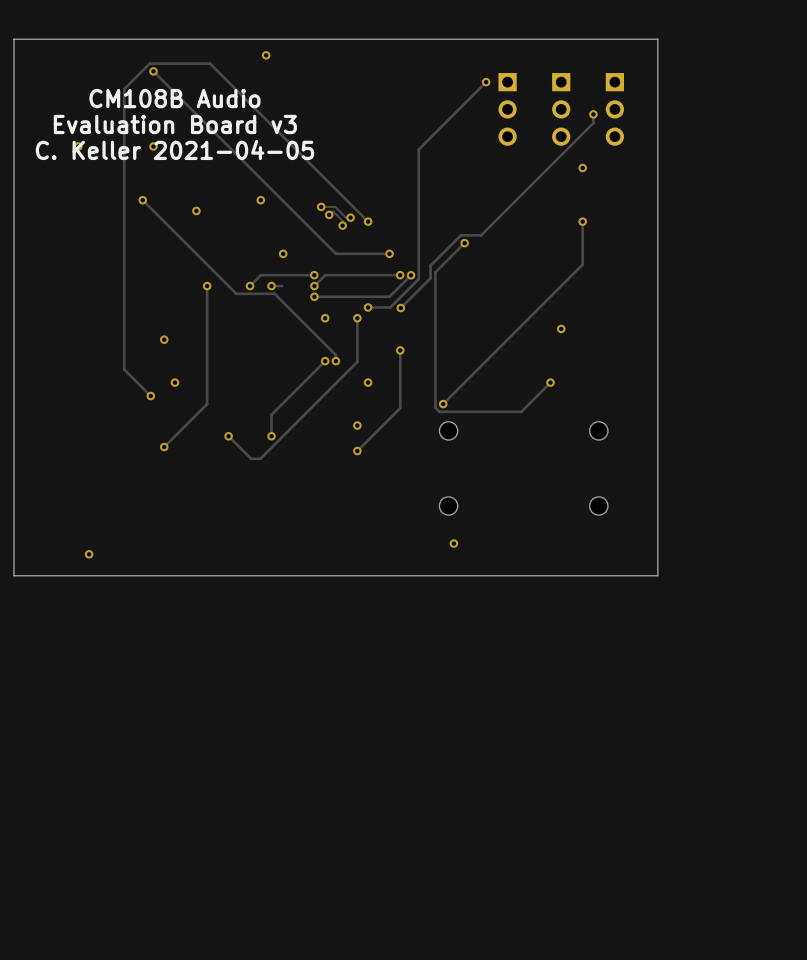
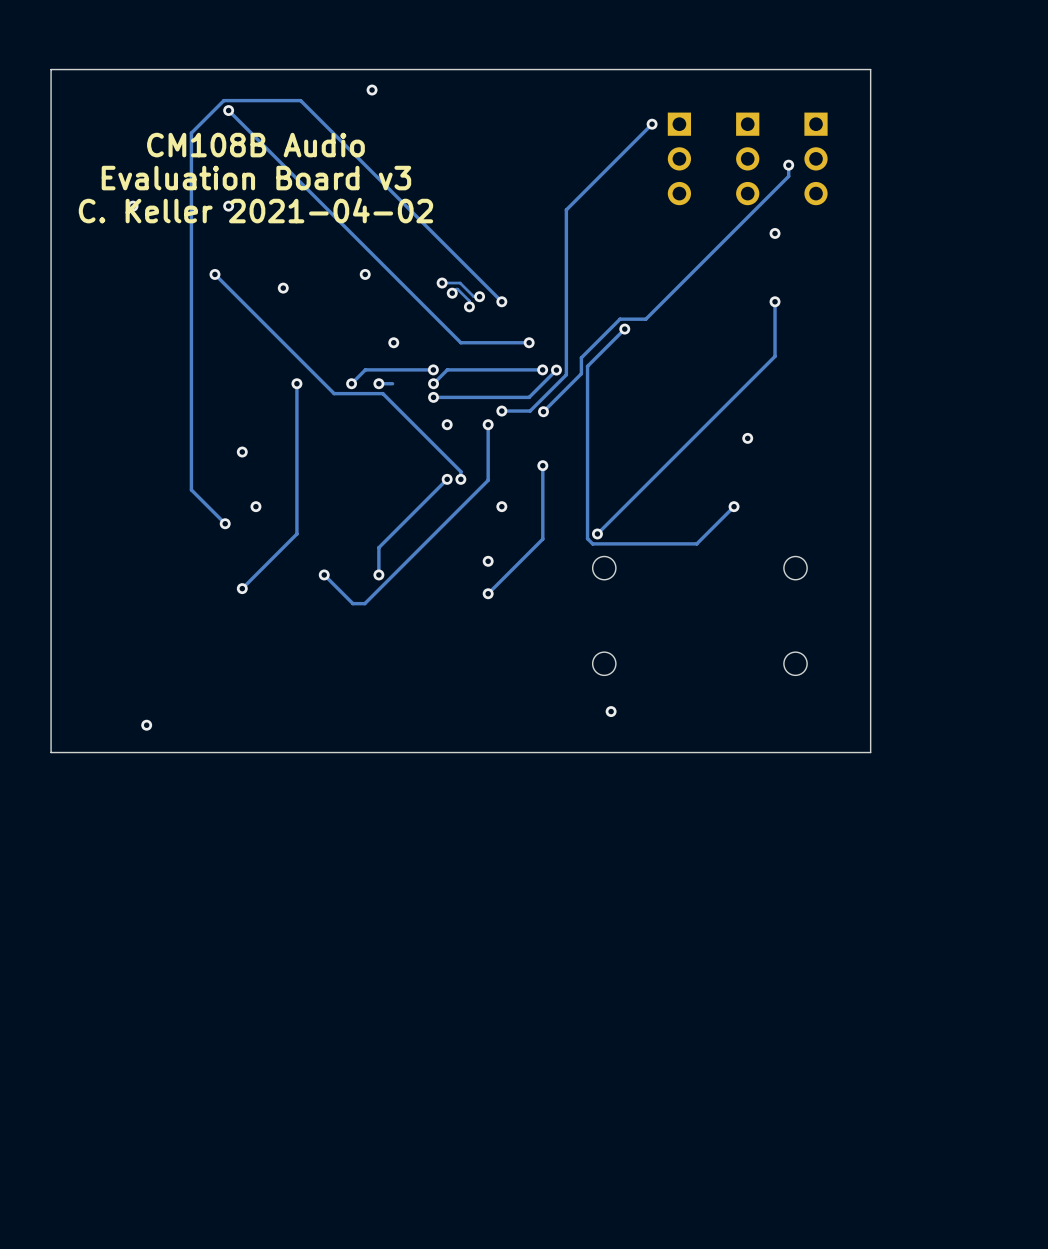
text: C. Keller 2021-04-05 (174, 150) -> C. Keller 2021-04-02 (255, 210)

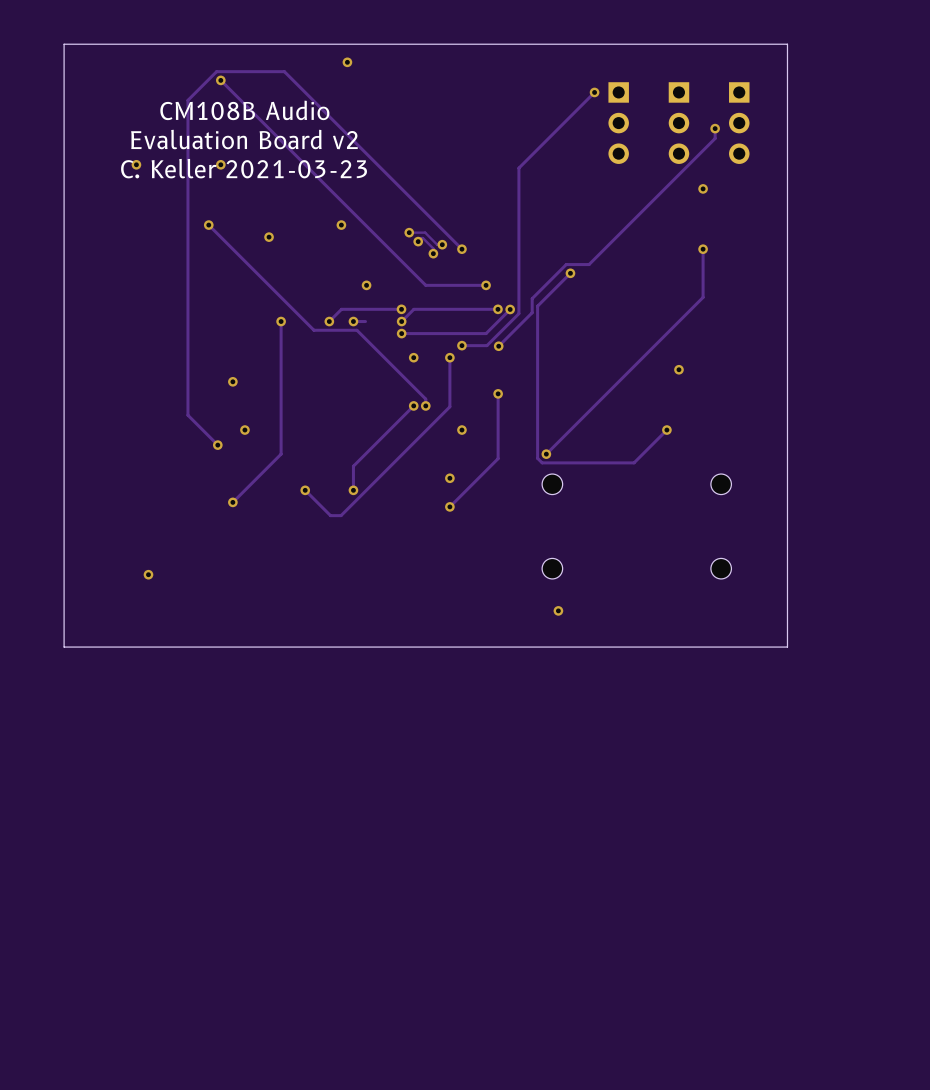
text: Evaluation Board v3 (256, 178) -> Evaluation Board v2 (244, 139)
text: C. Keller 2021-04-02 (255, 210) -> C. Keller 2021-03-23 (244, 168)
via position: (146, 725) -> (148, 574)

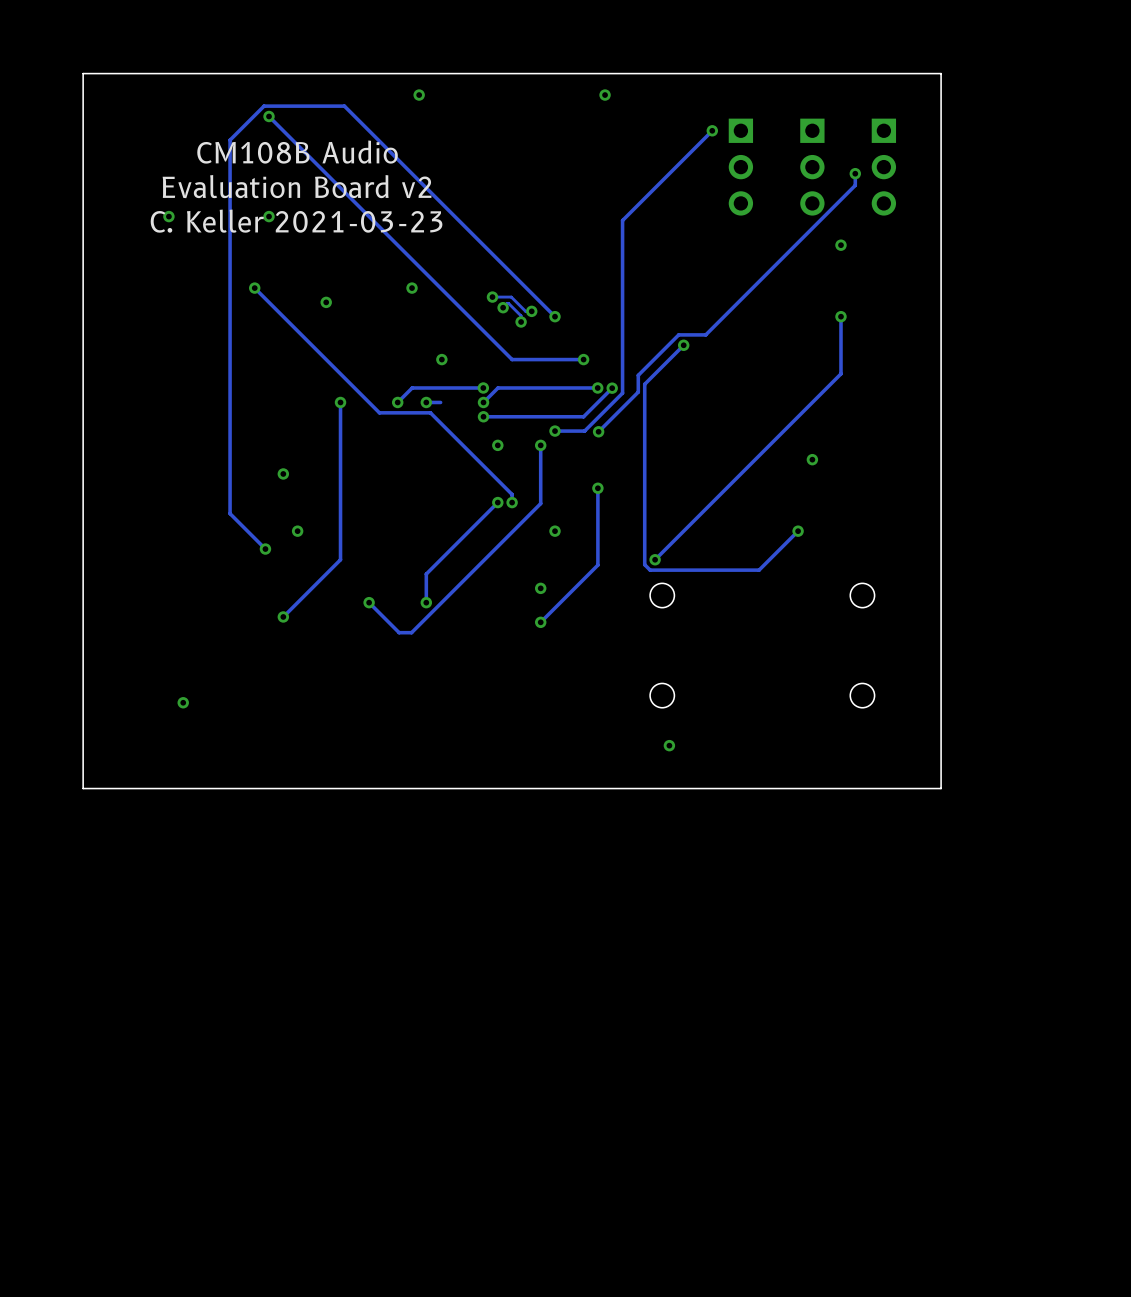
via: none -> (605, 95)

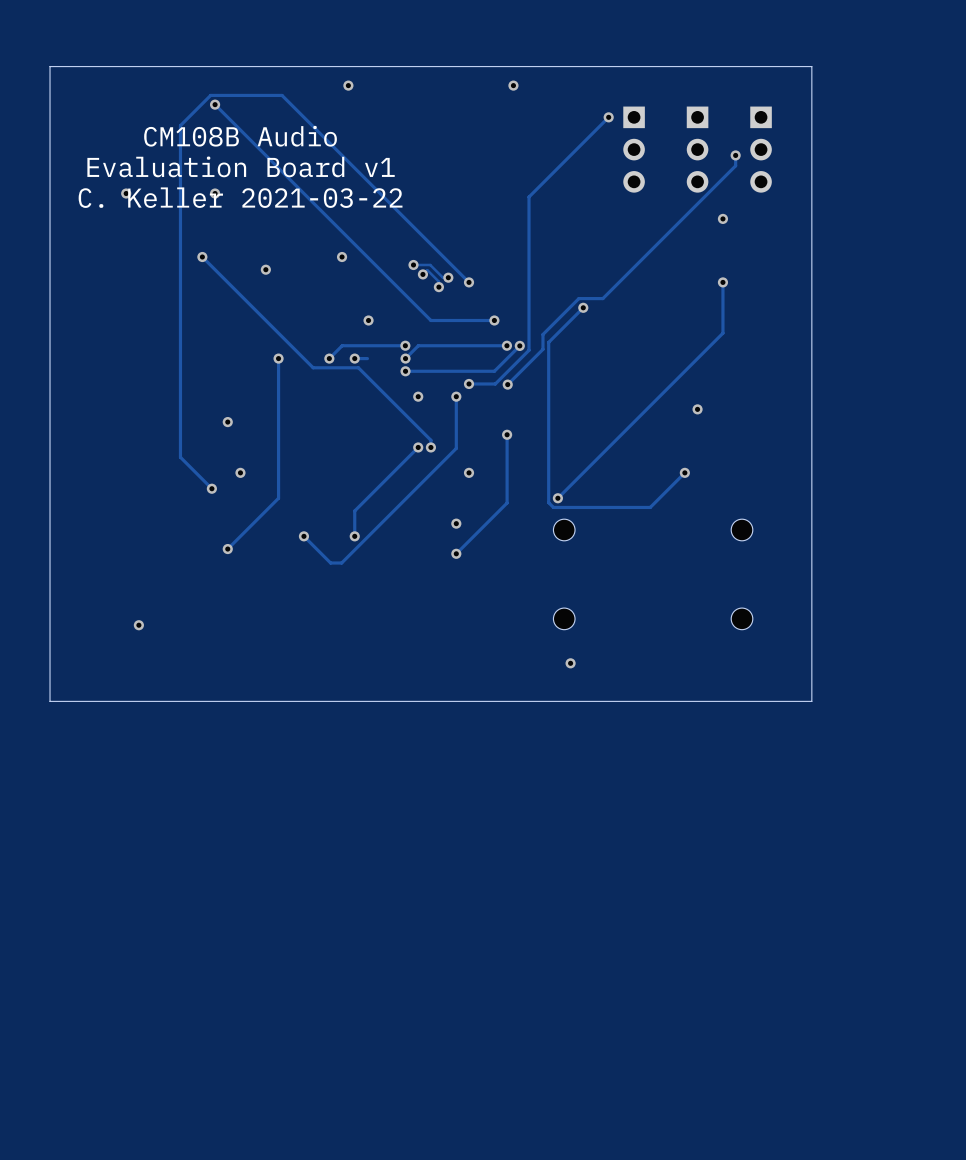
text: Evaluation Board v2 (297, 186) -> Evaluation Board v1 (241, 166)
text: C. Keller 2021-03-23 (296, 221) -> C. Keller 2021-03-22 (240, 197)

